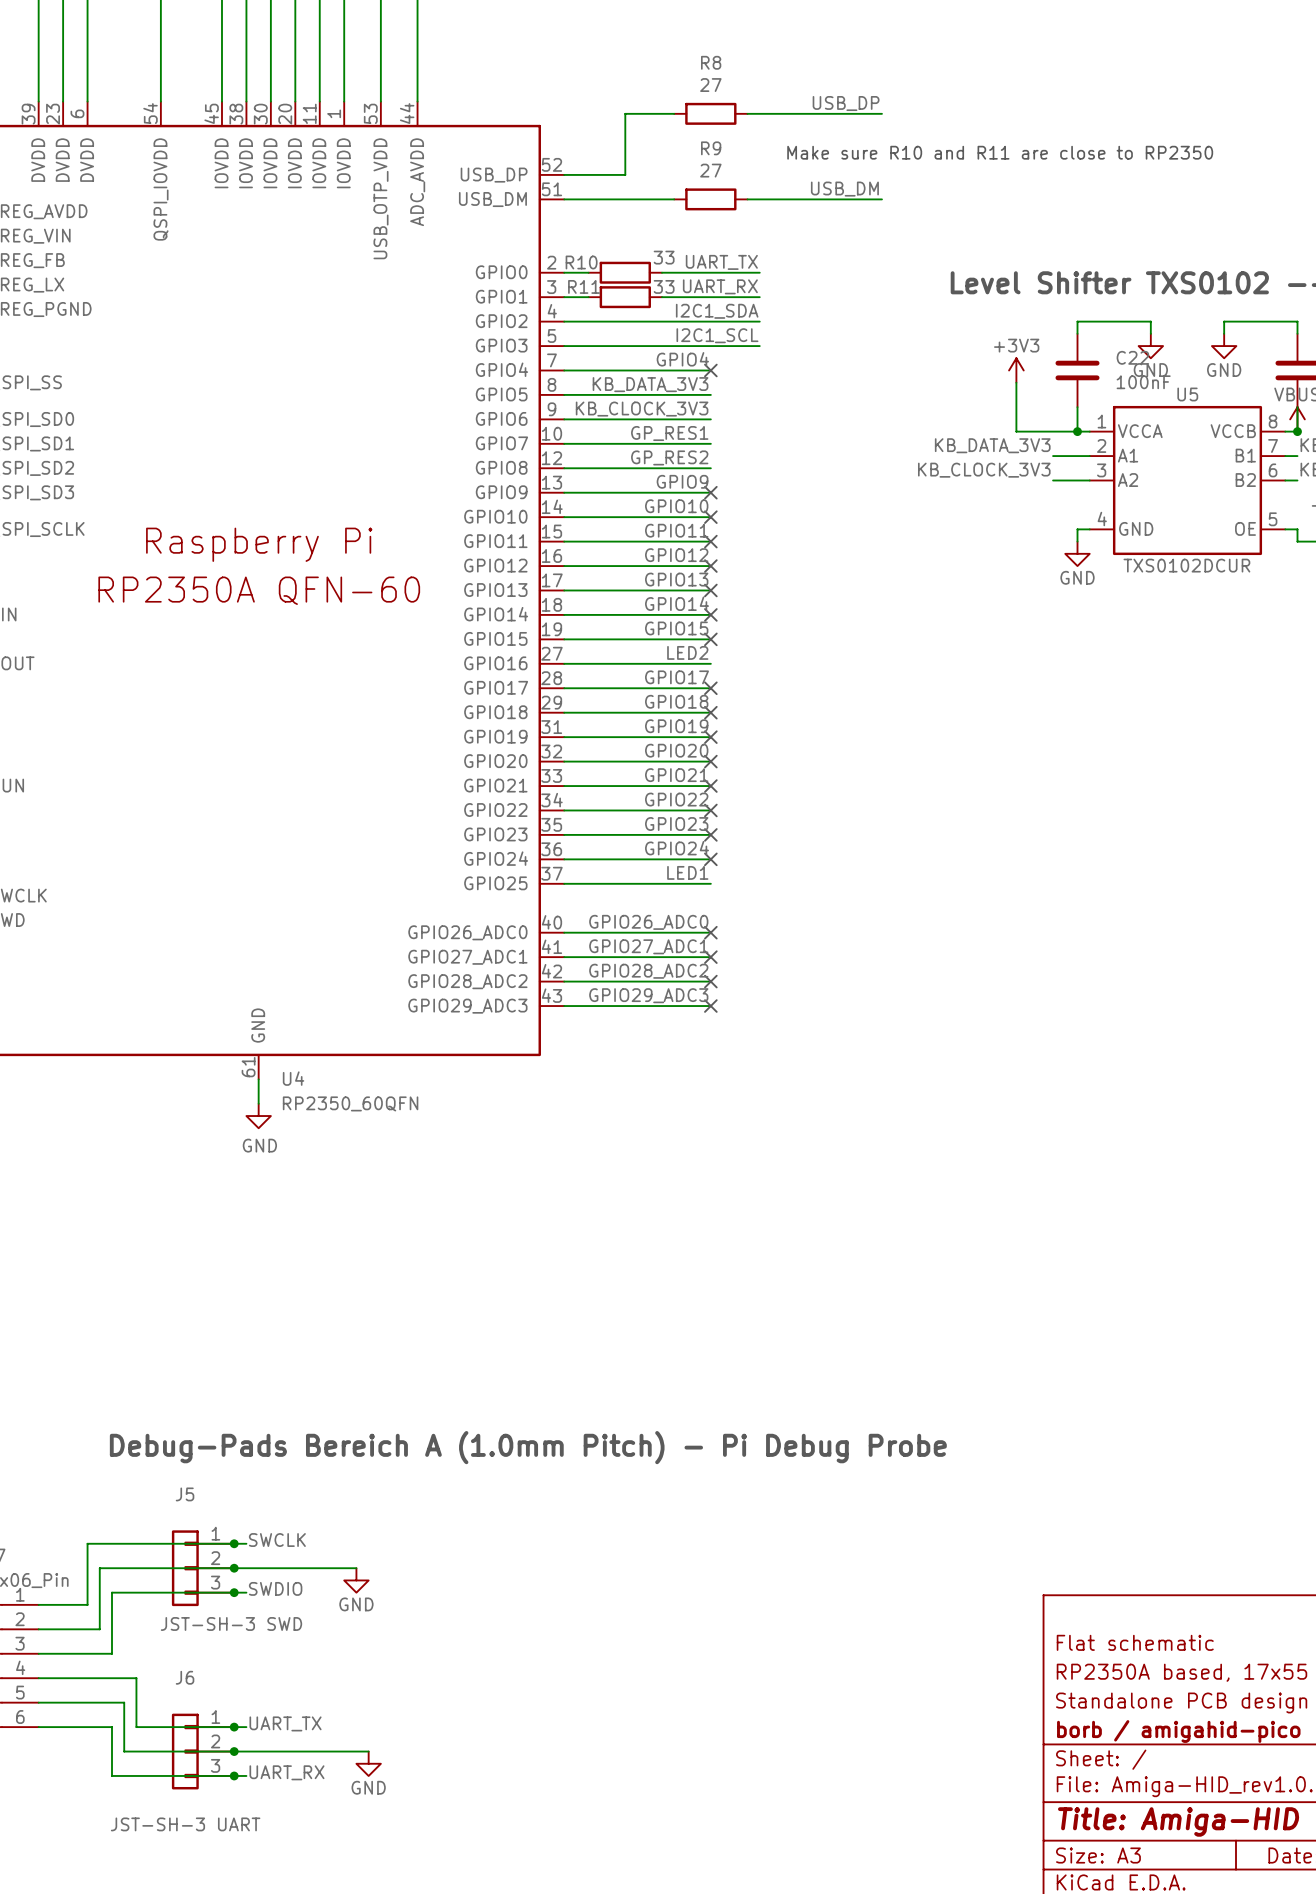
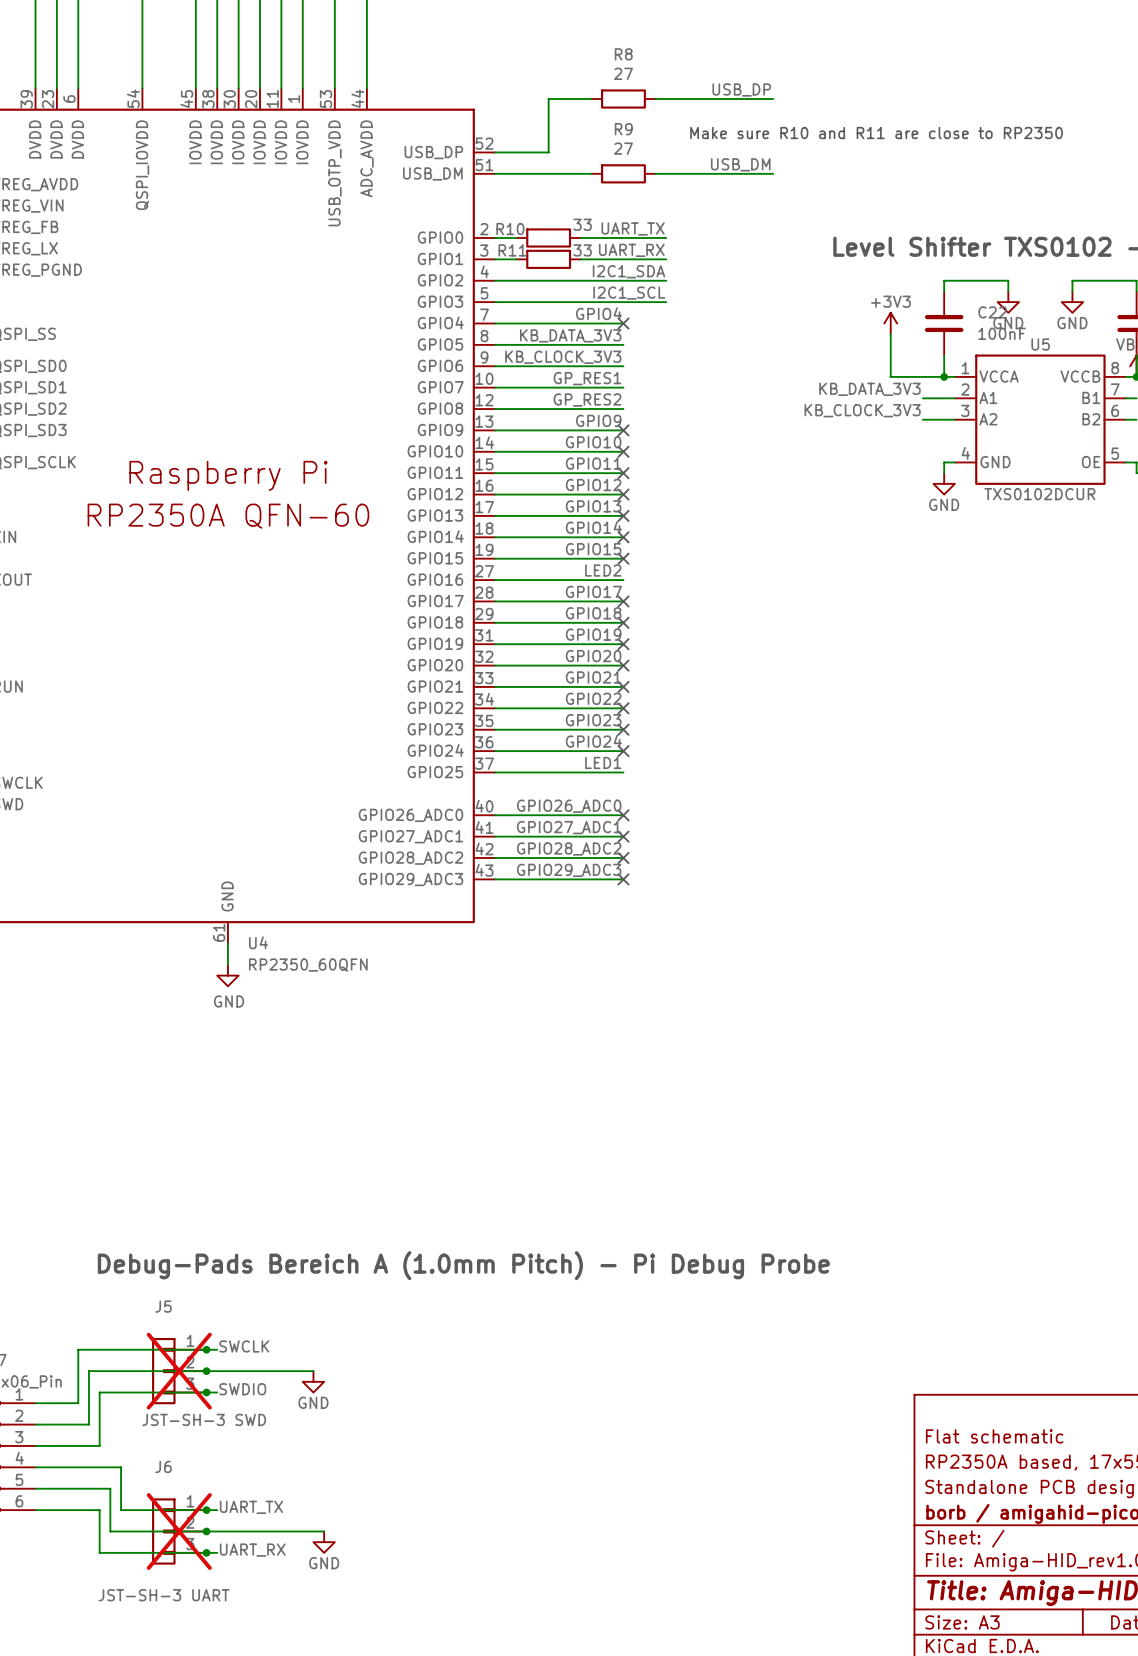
J5 do-not-place cross: none -> (179, 1371)
J6 do-not-place cross: none -> (179, 1531)

